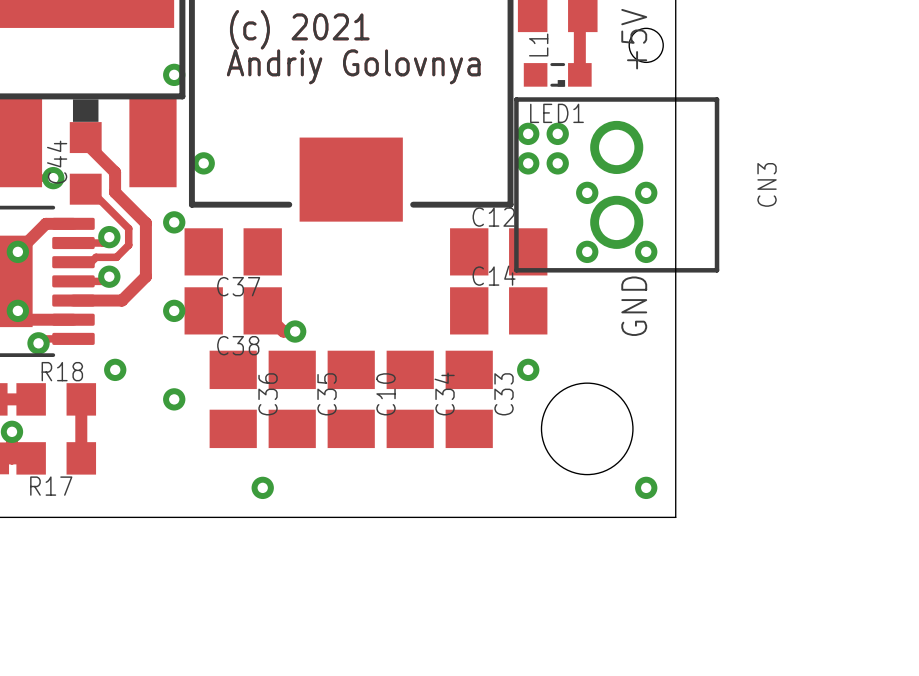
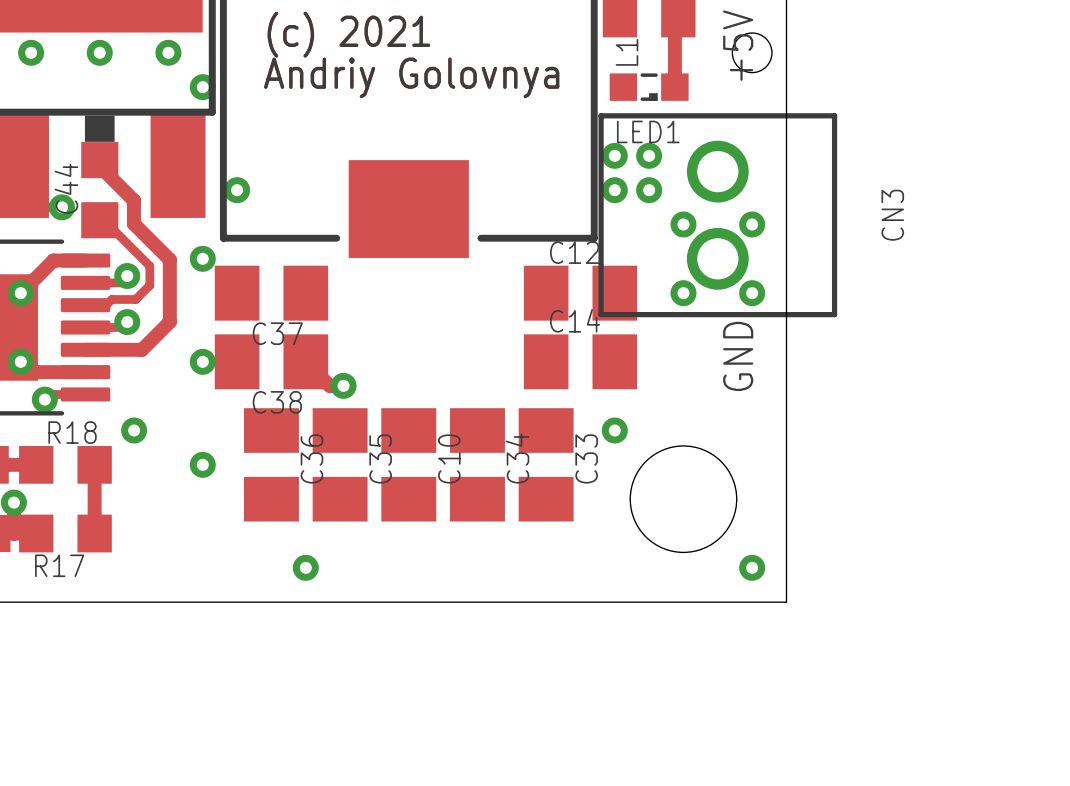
via: none -> (31, 52)
via: none -> (99, 52)
via: none -> (168, 52)

